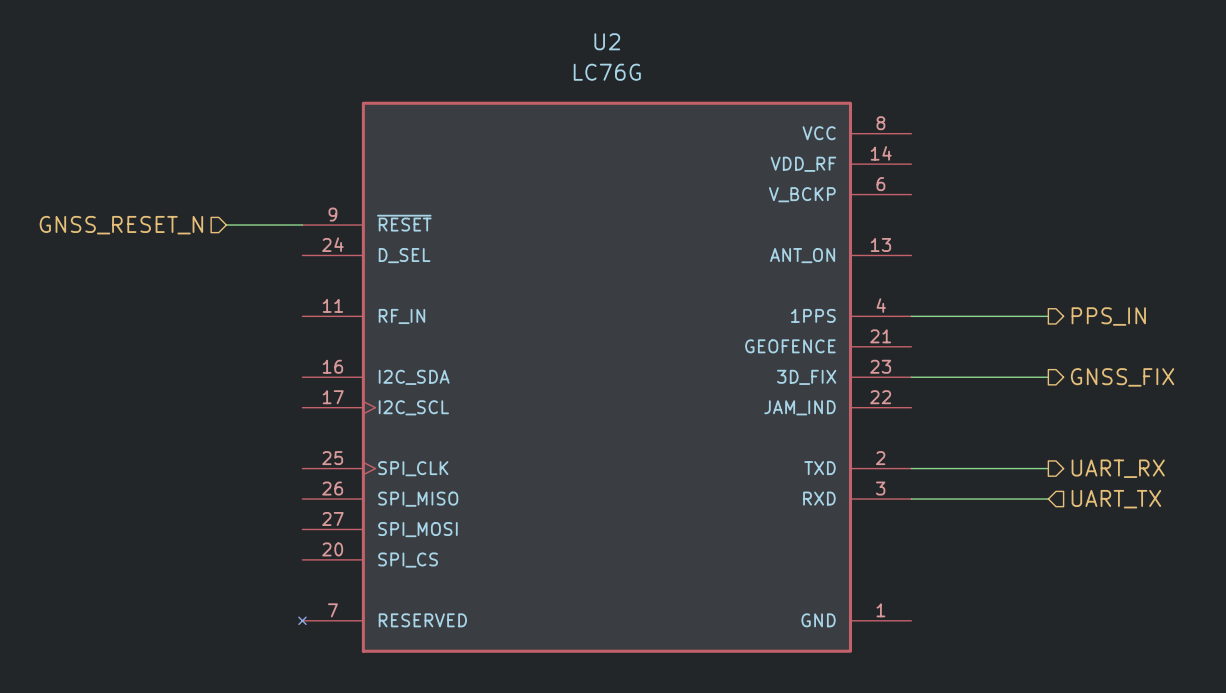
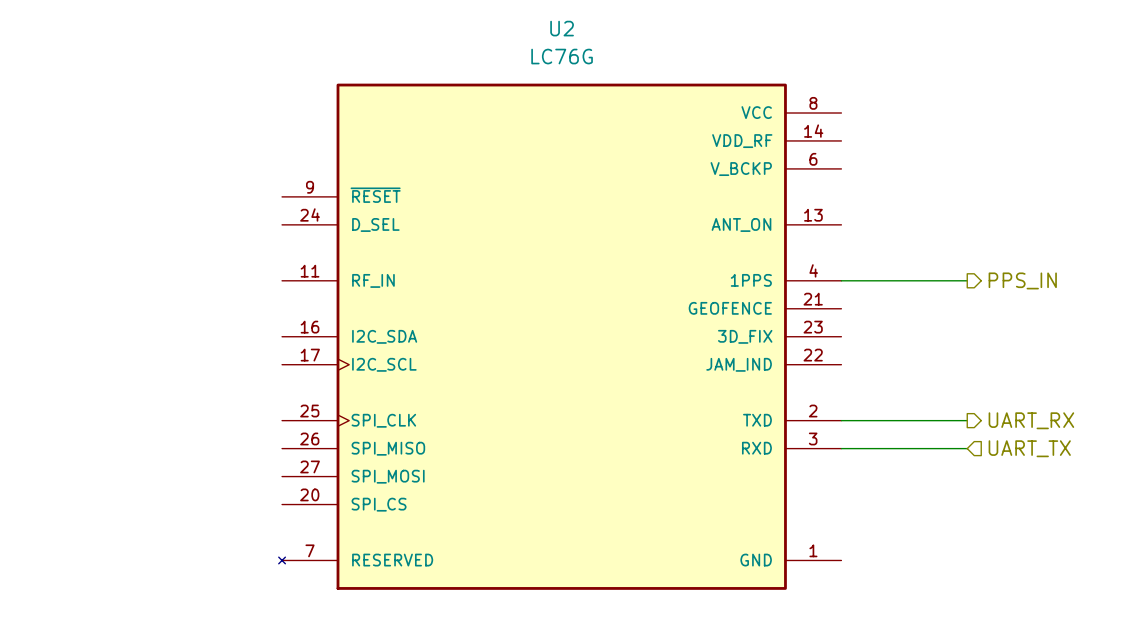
hierarchical label: GNSS_RESET_N (121, 225) -> none
wire: (226, 225) (302, 225) -> none
wire: (911, 377) (1048, 377) -> none
hierarchical label: GNSS_FIX (1122, 377) -> none

